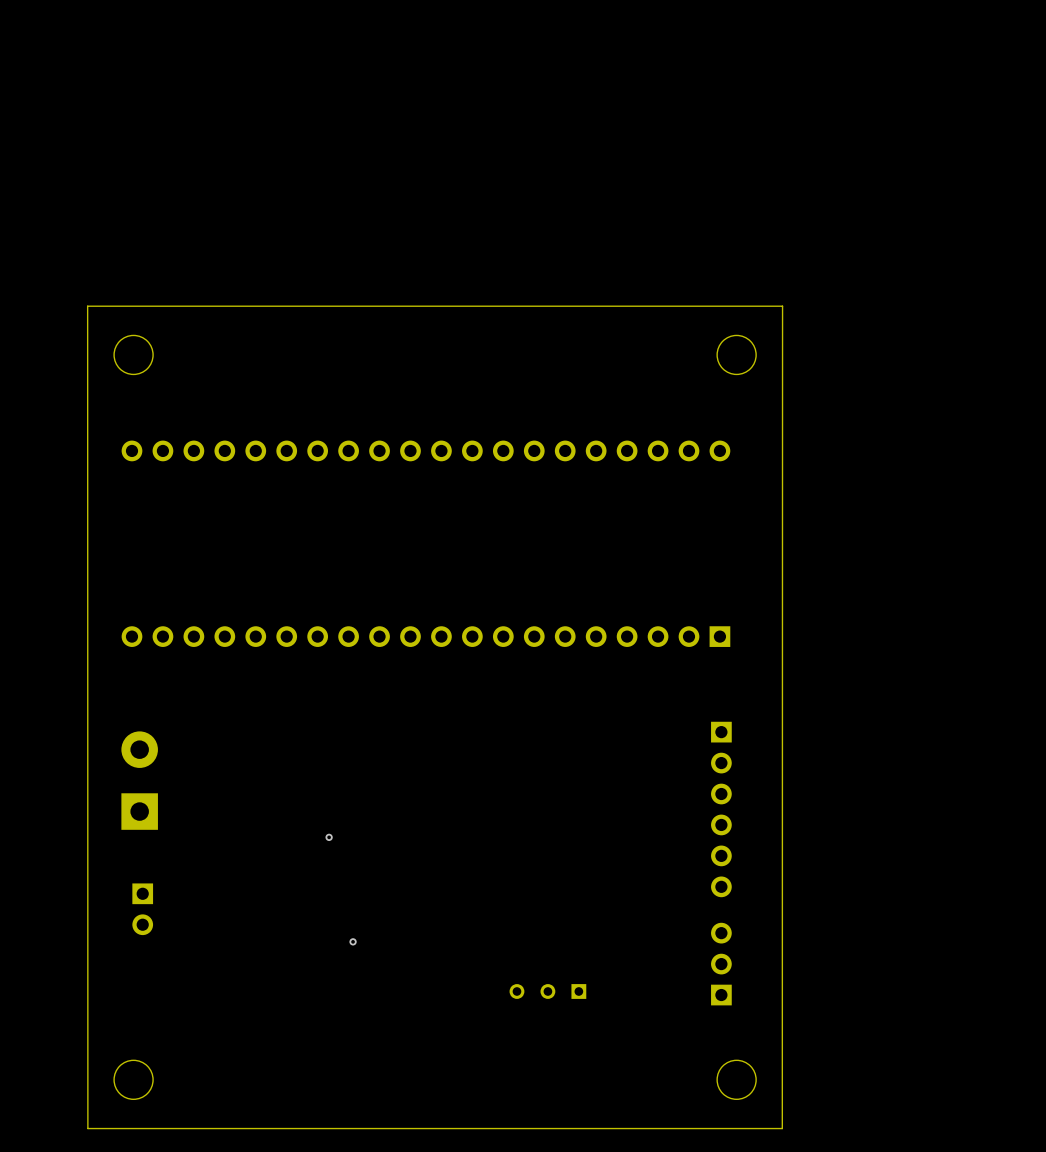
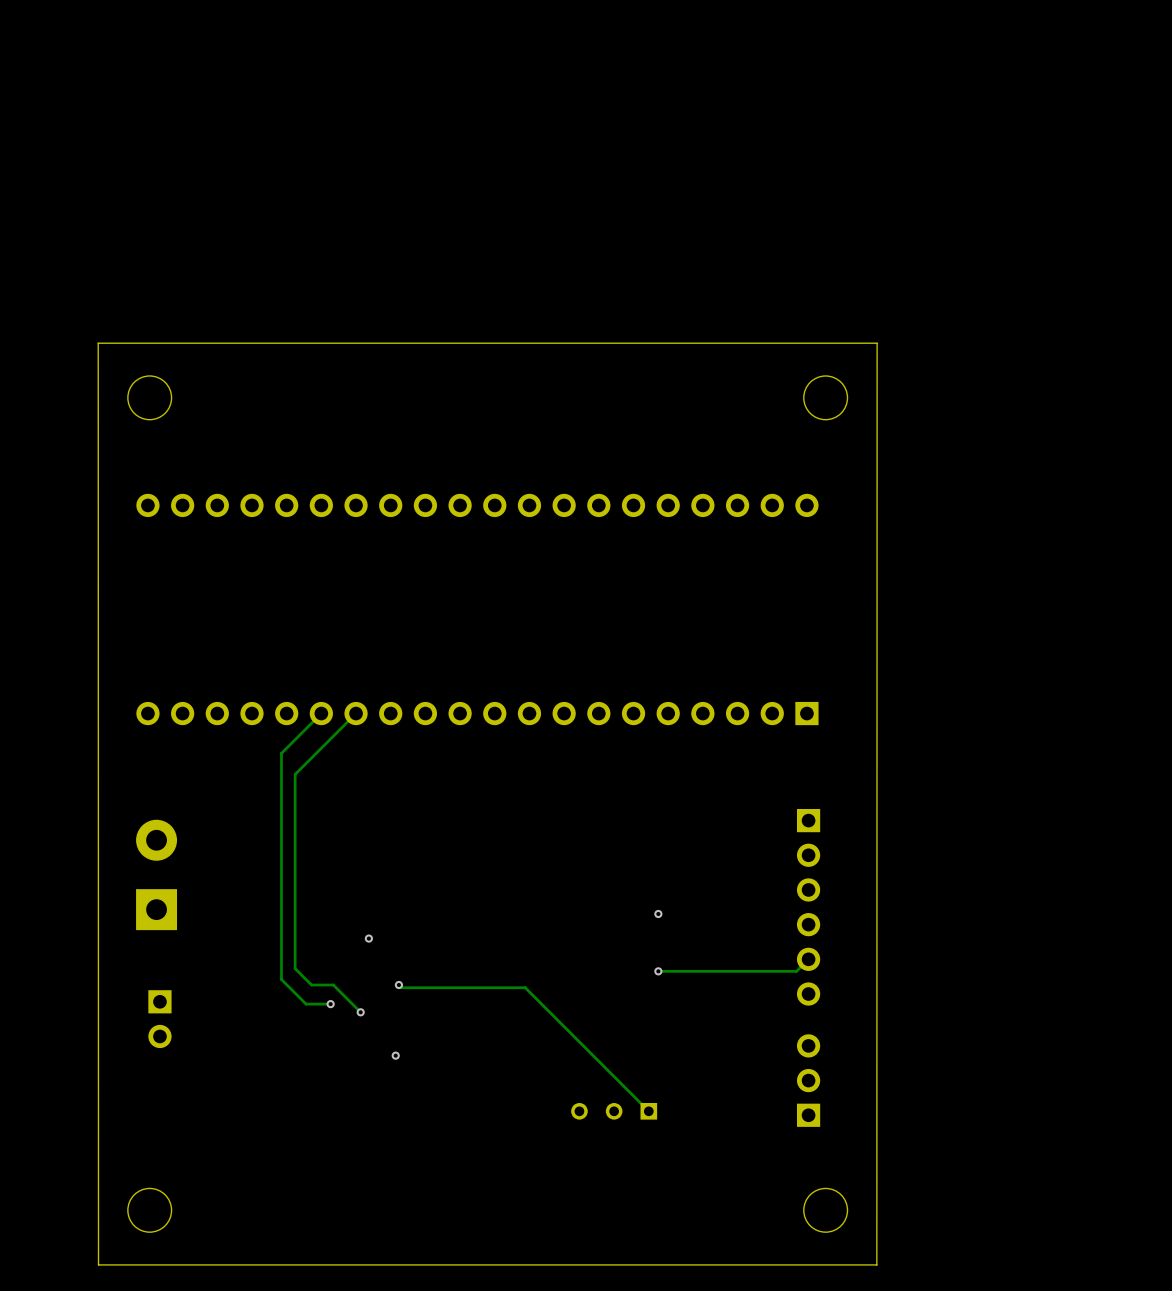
track: none -> (321, 713) (281, 753) (281, 979) (306, 1004) (330, 1004)
track: none -> (356, 713) (295, 774) (295, 968) (311, 985) (333, 985) (360, 1012)
via: none -> (658, 913)
track: none -> (808, 959) (796, 971) (658, 971)
via: none -> (658, 971)
track: none -> (398, 985) (401, 987) (525, 987) (648, 1111)
via: none -> (398, 985)
via: none -> (330, 1004)
via: none -> (360, 1012)

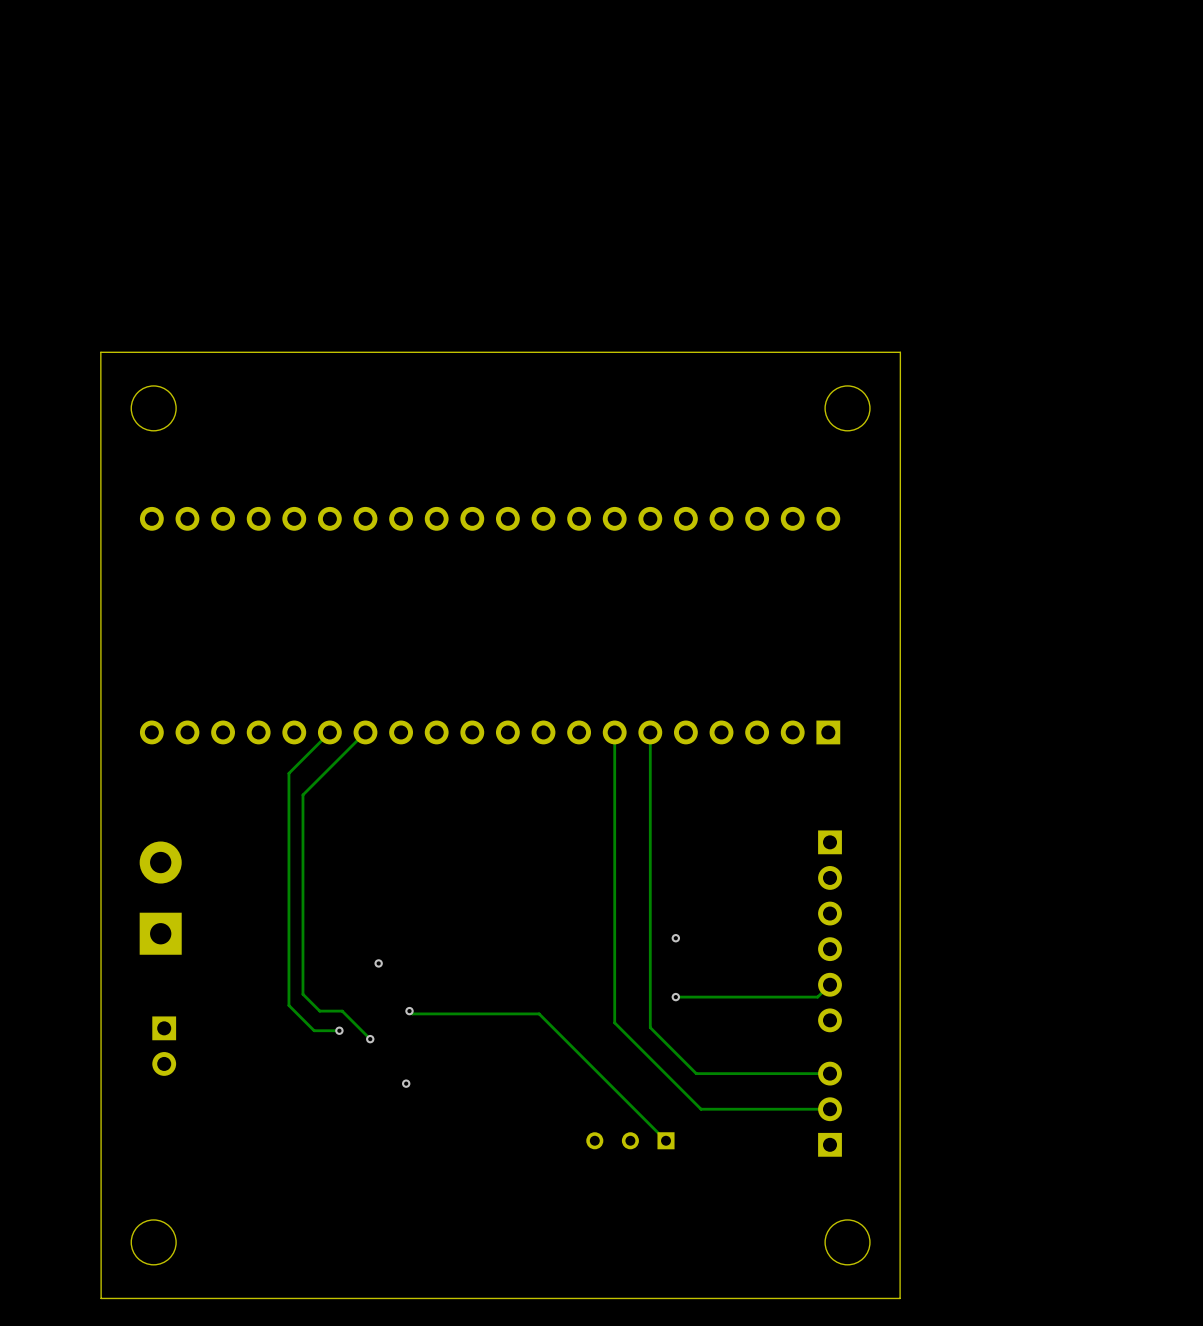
track: none -> (614, 732) (614, 1022) (701, 1109) (830, 1109)
track: none -> (650, 732) (650, 1027) (696, 1073) (830, 1073)

